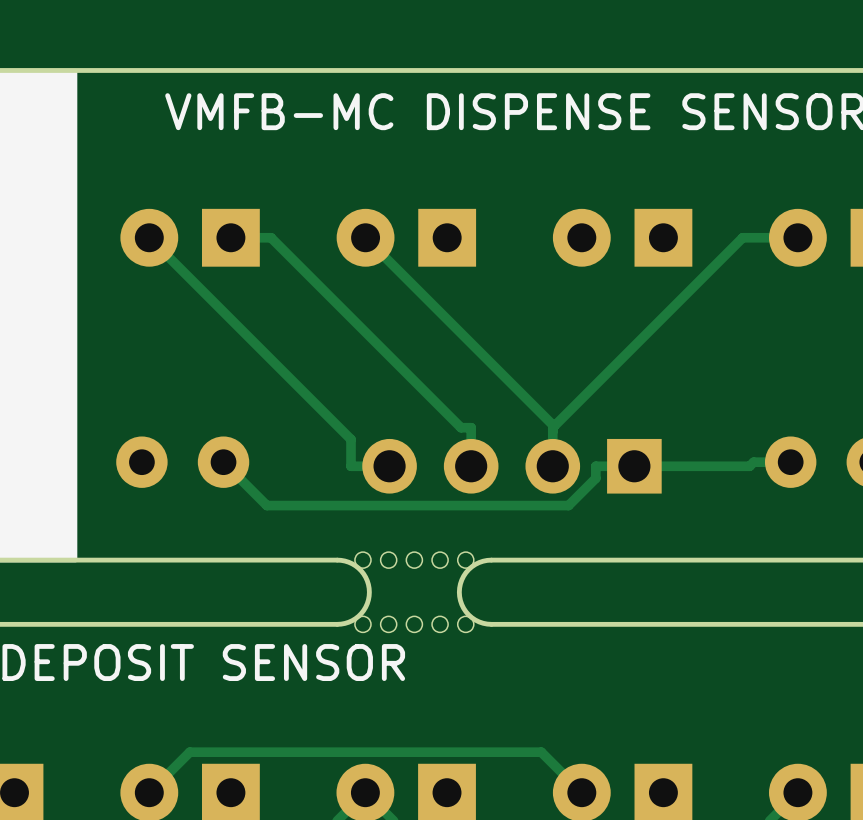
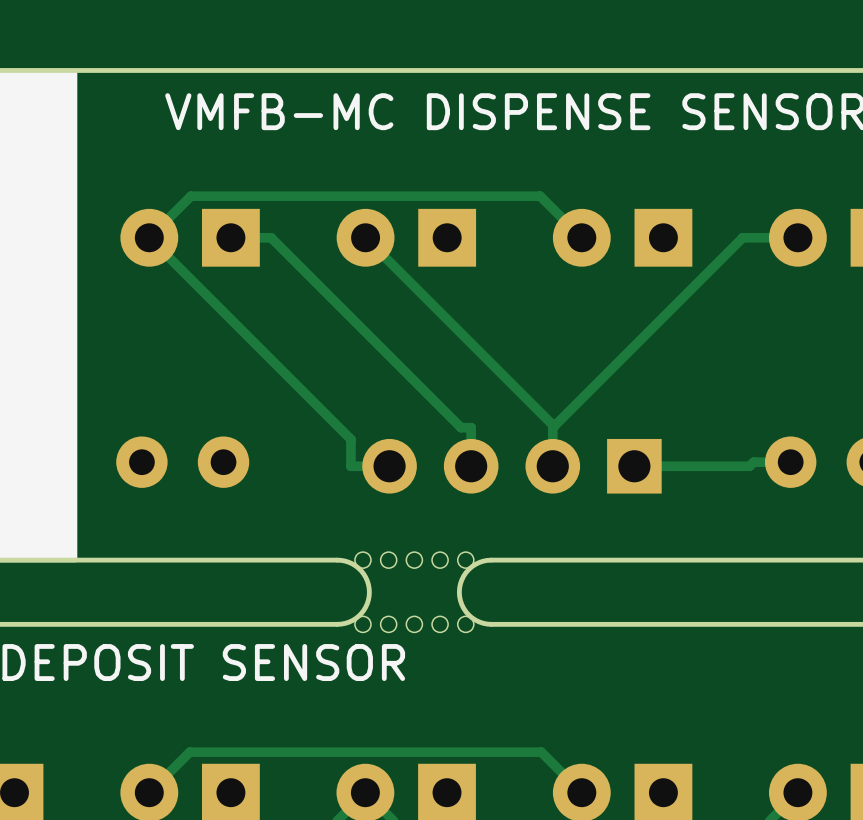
track: none -> (581, 237) (540, 196) (190, 196) (149, 237)
track: (223, 462) (266, 505) (568, 505) (595, 478) (595, 466) (634, 466) -> none

